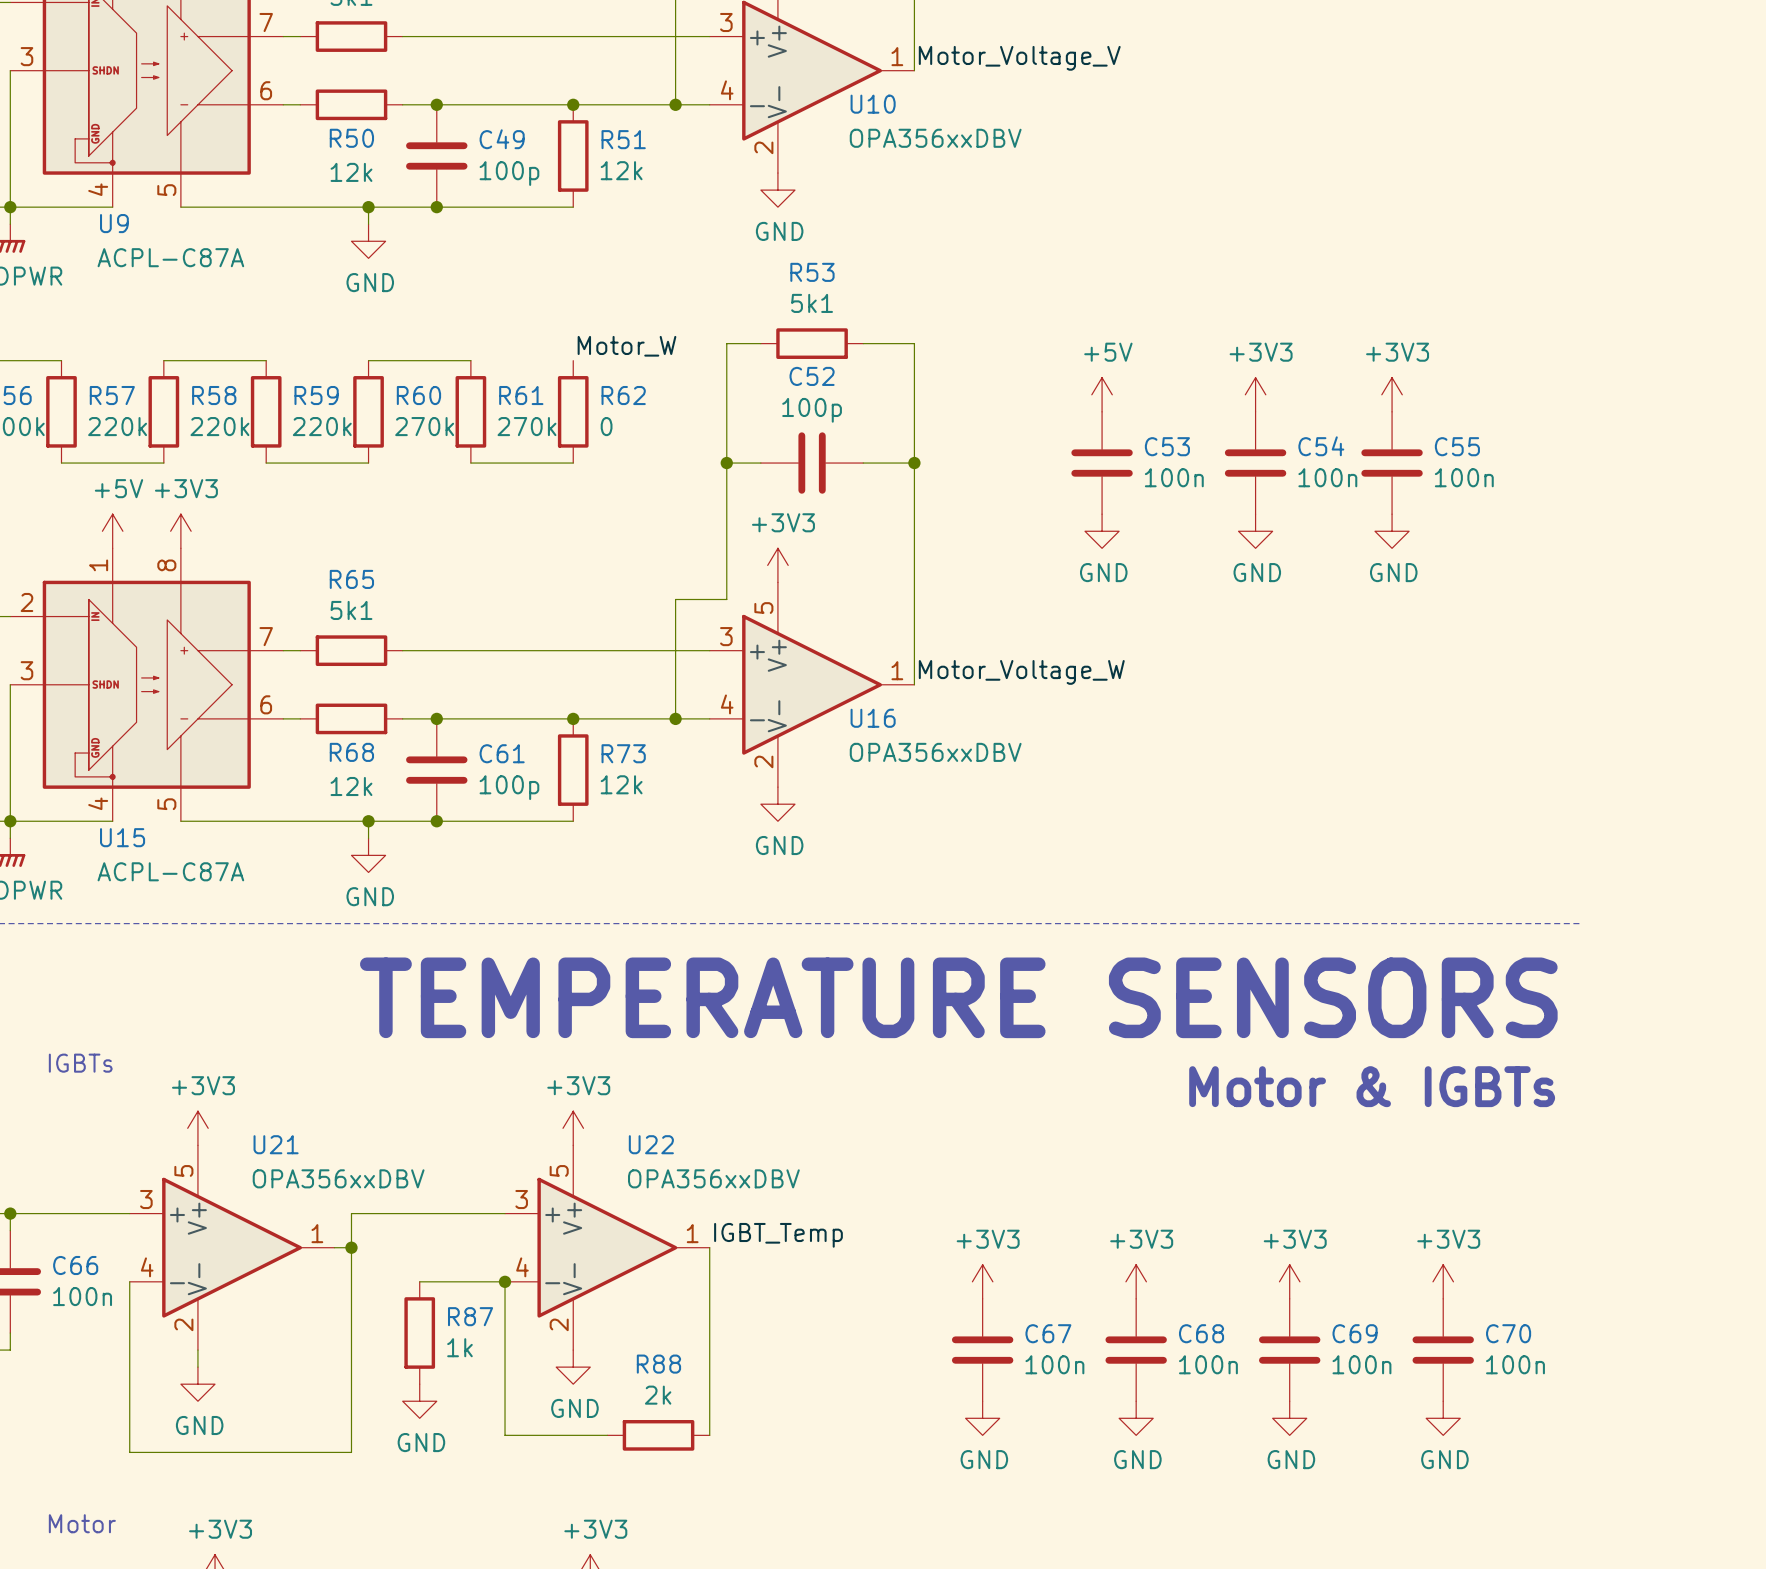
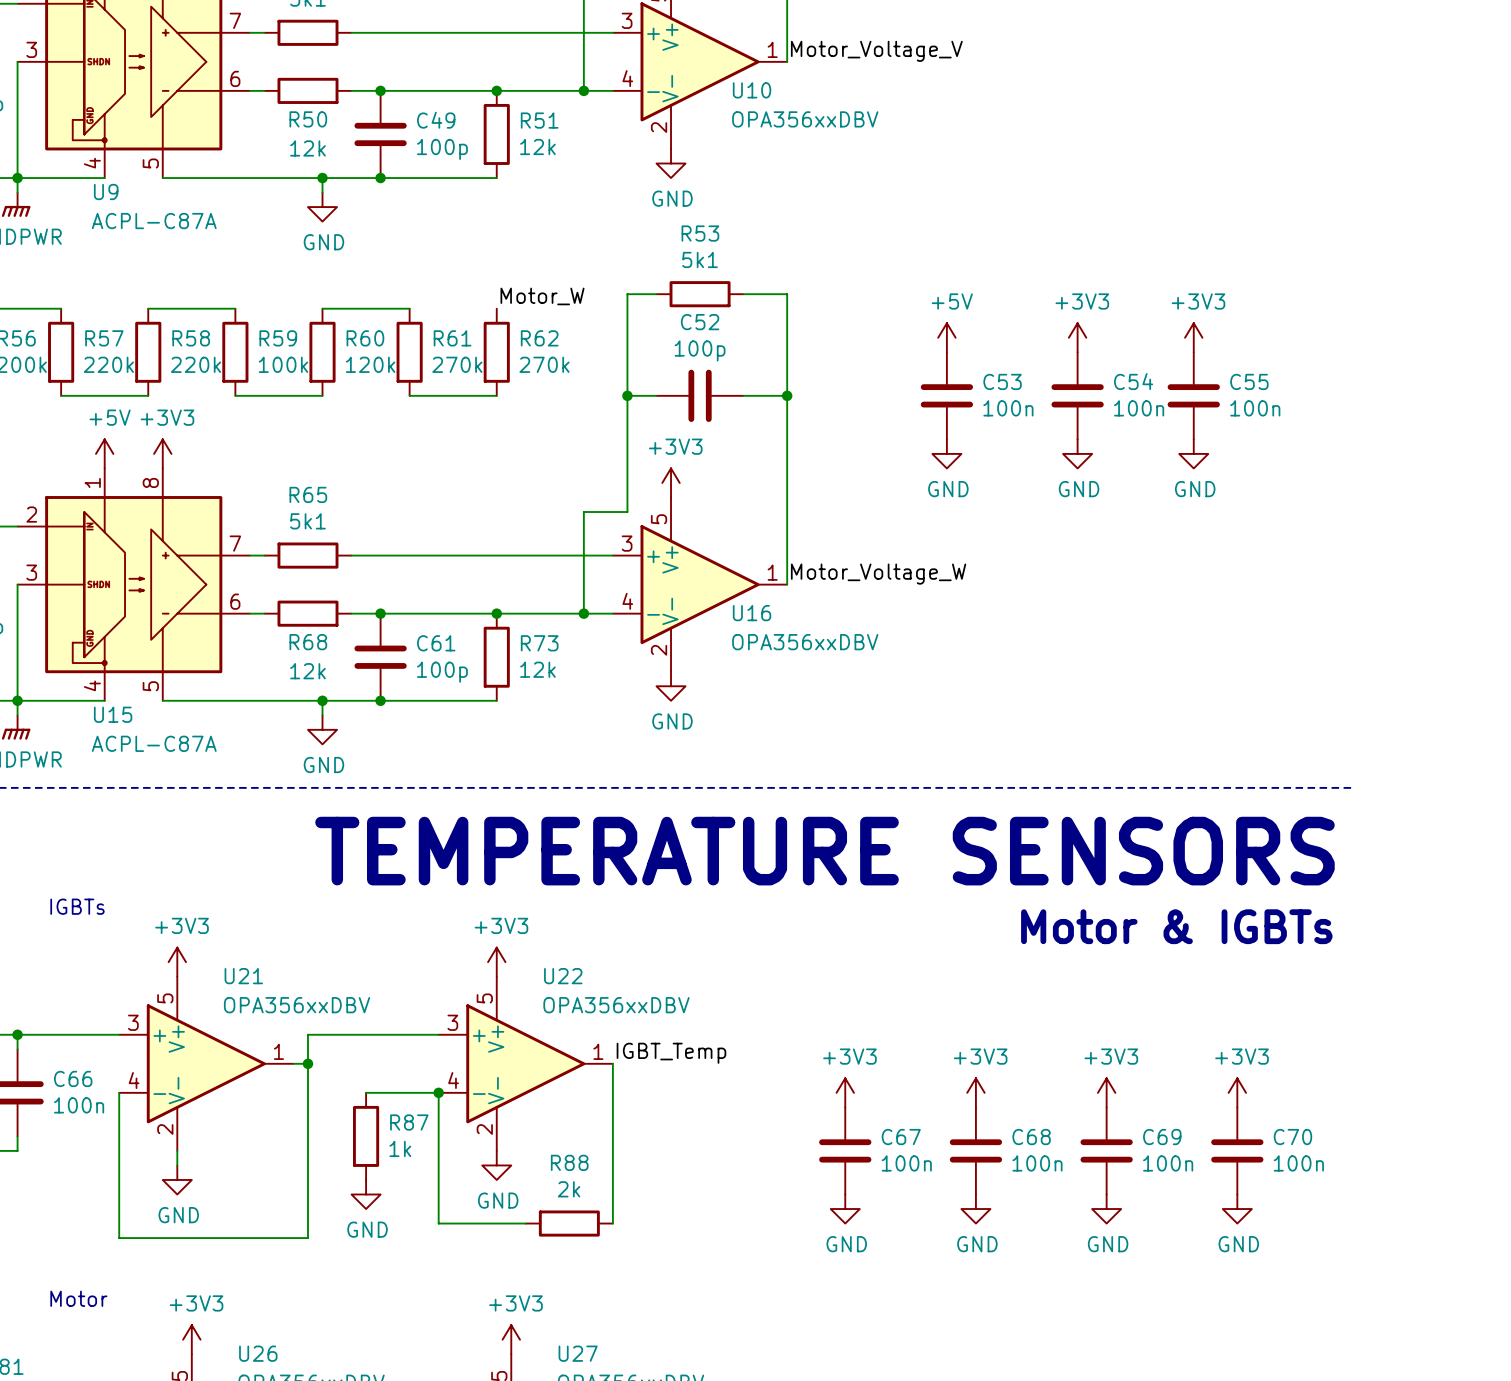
R59 value: 220k (322, 426) -> 100k (283, 364)
R60 value: 270k (424, 426) -> 120k (370, 364)
R62 value: 0 (606, 426) -> 270k (544, 364)

